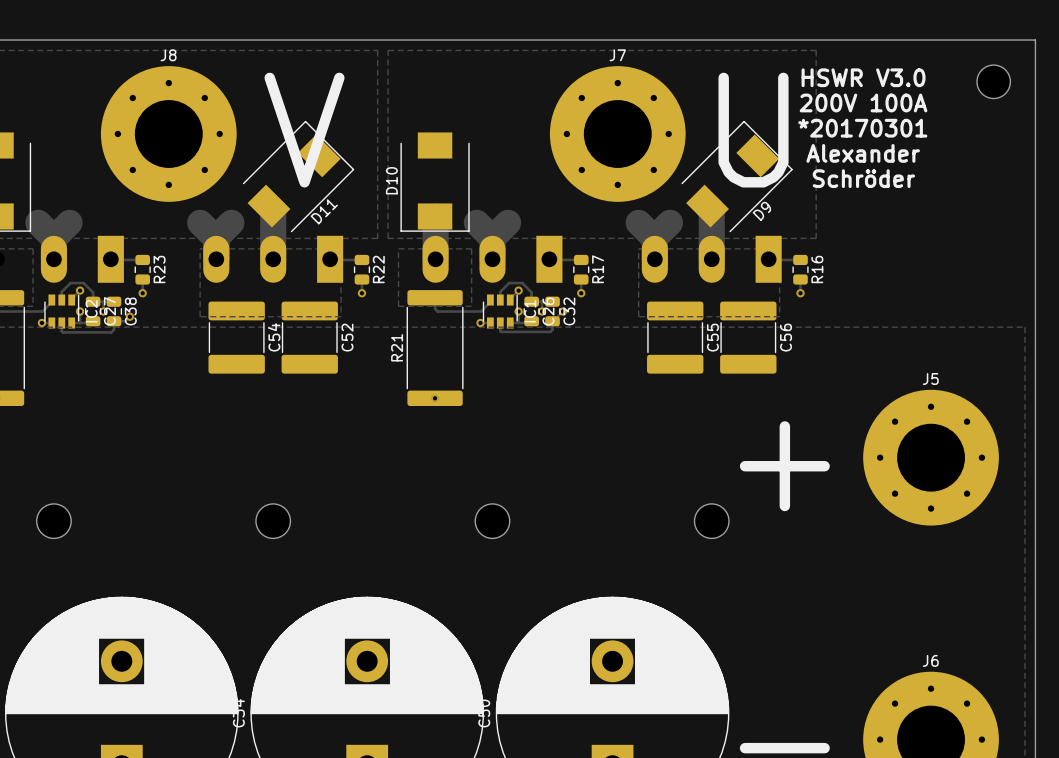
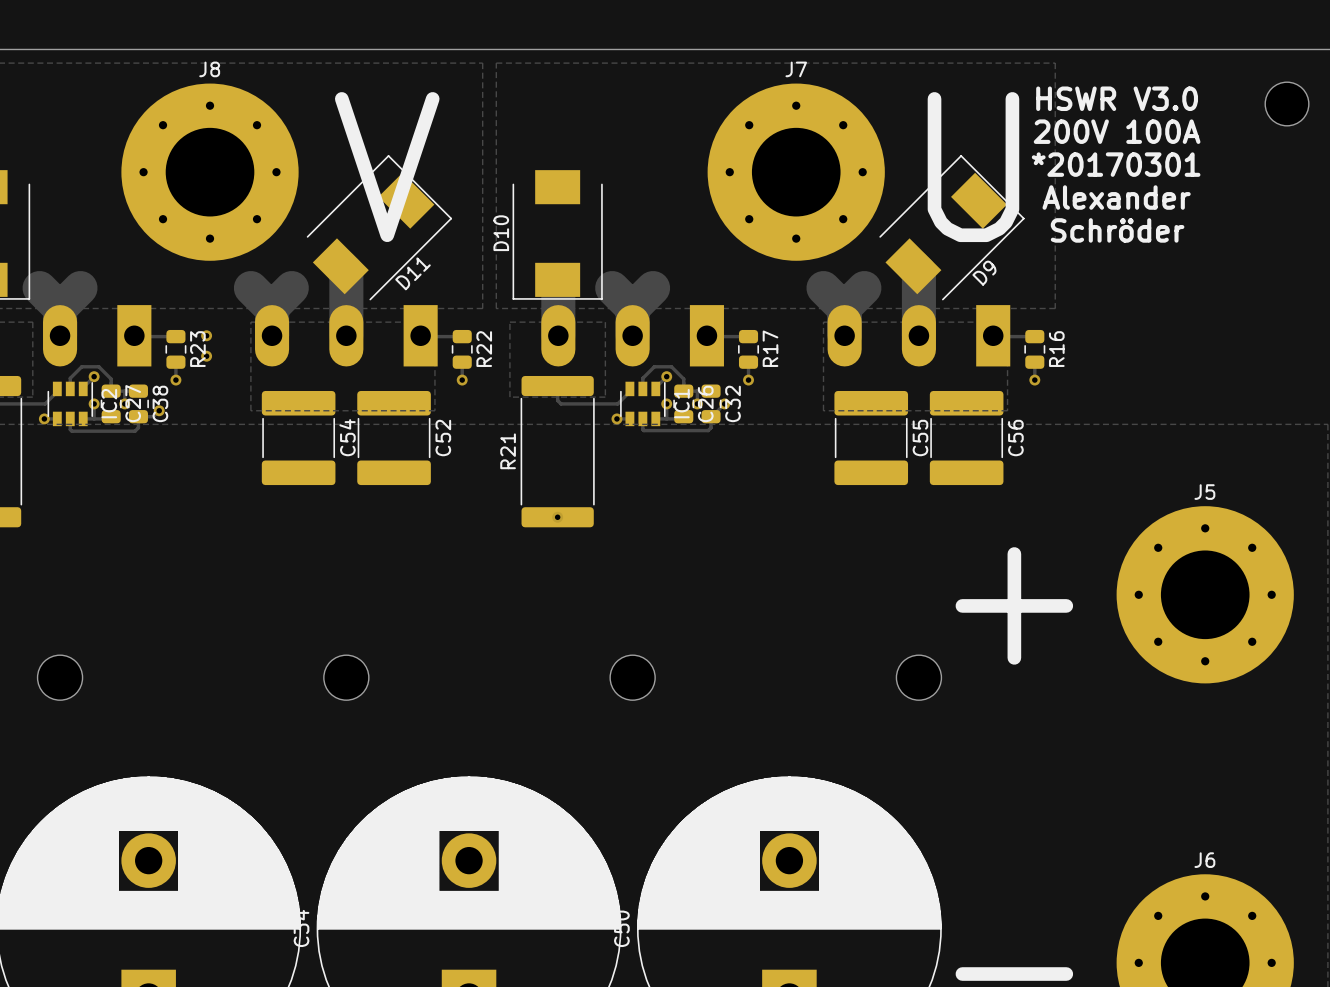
via: none -> (206, 335)
via: none -> (206, 356)

